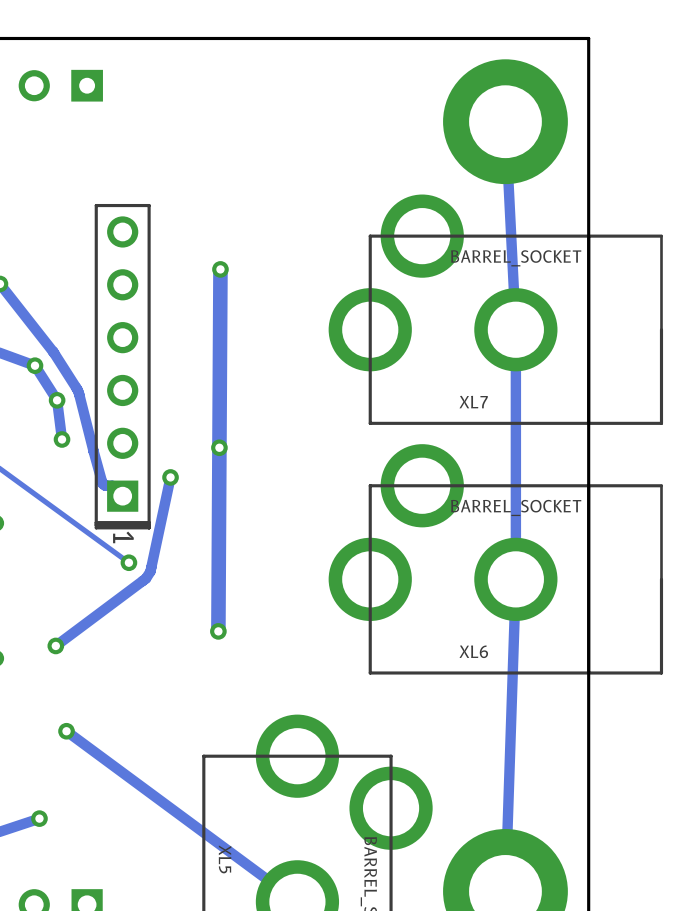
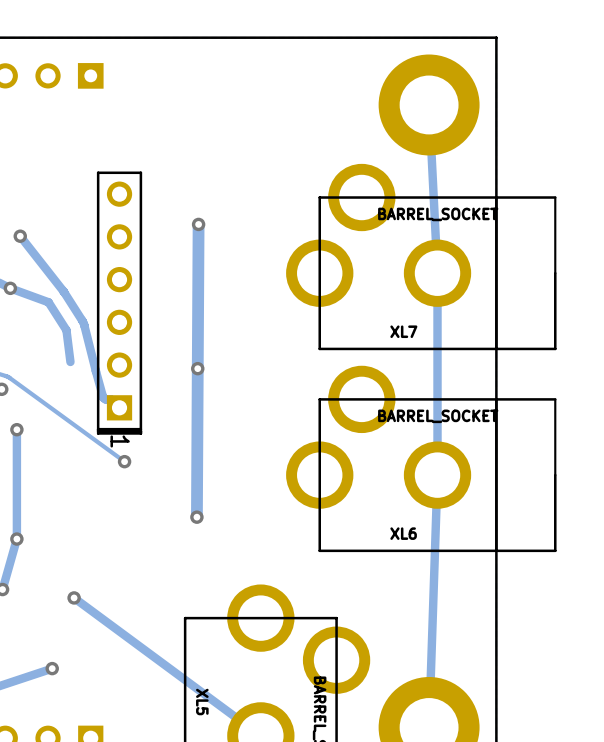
via: (35, 365) -> none
via: (57, 400) -> none
via: (62, 439) -> none
track: (170, 477) (150, 571) (145, 578) (55, 645) -> none
via: (170, 477) -> none
via: (55, 645) -> none

